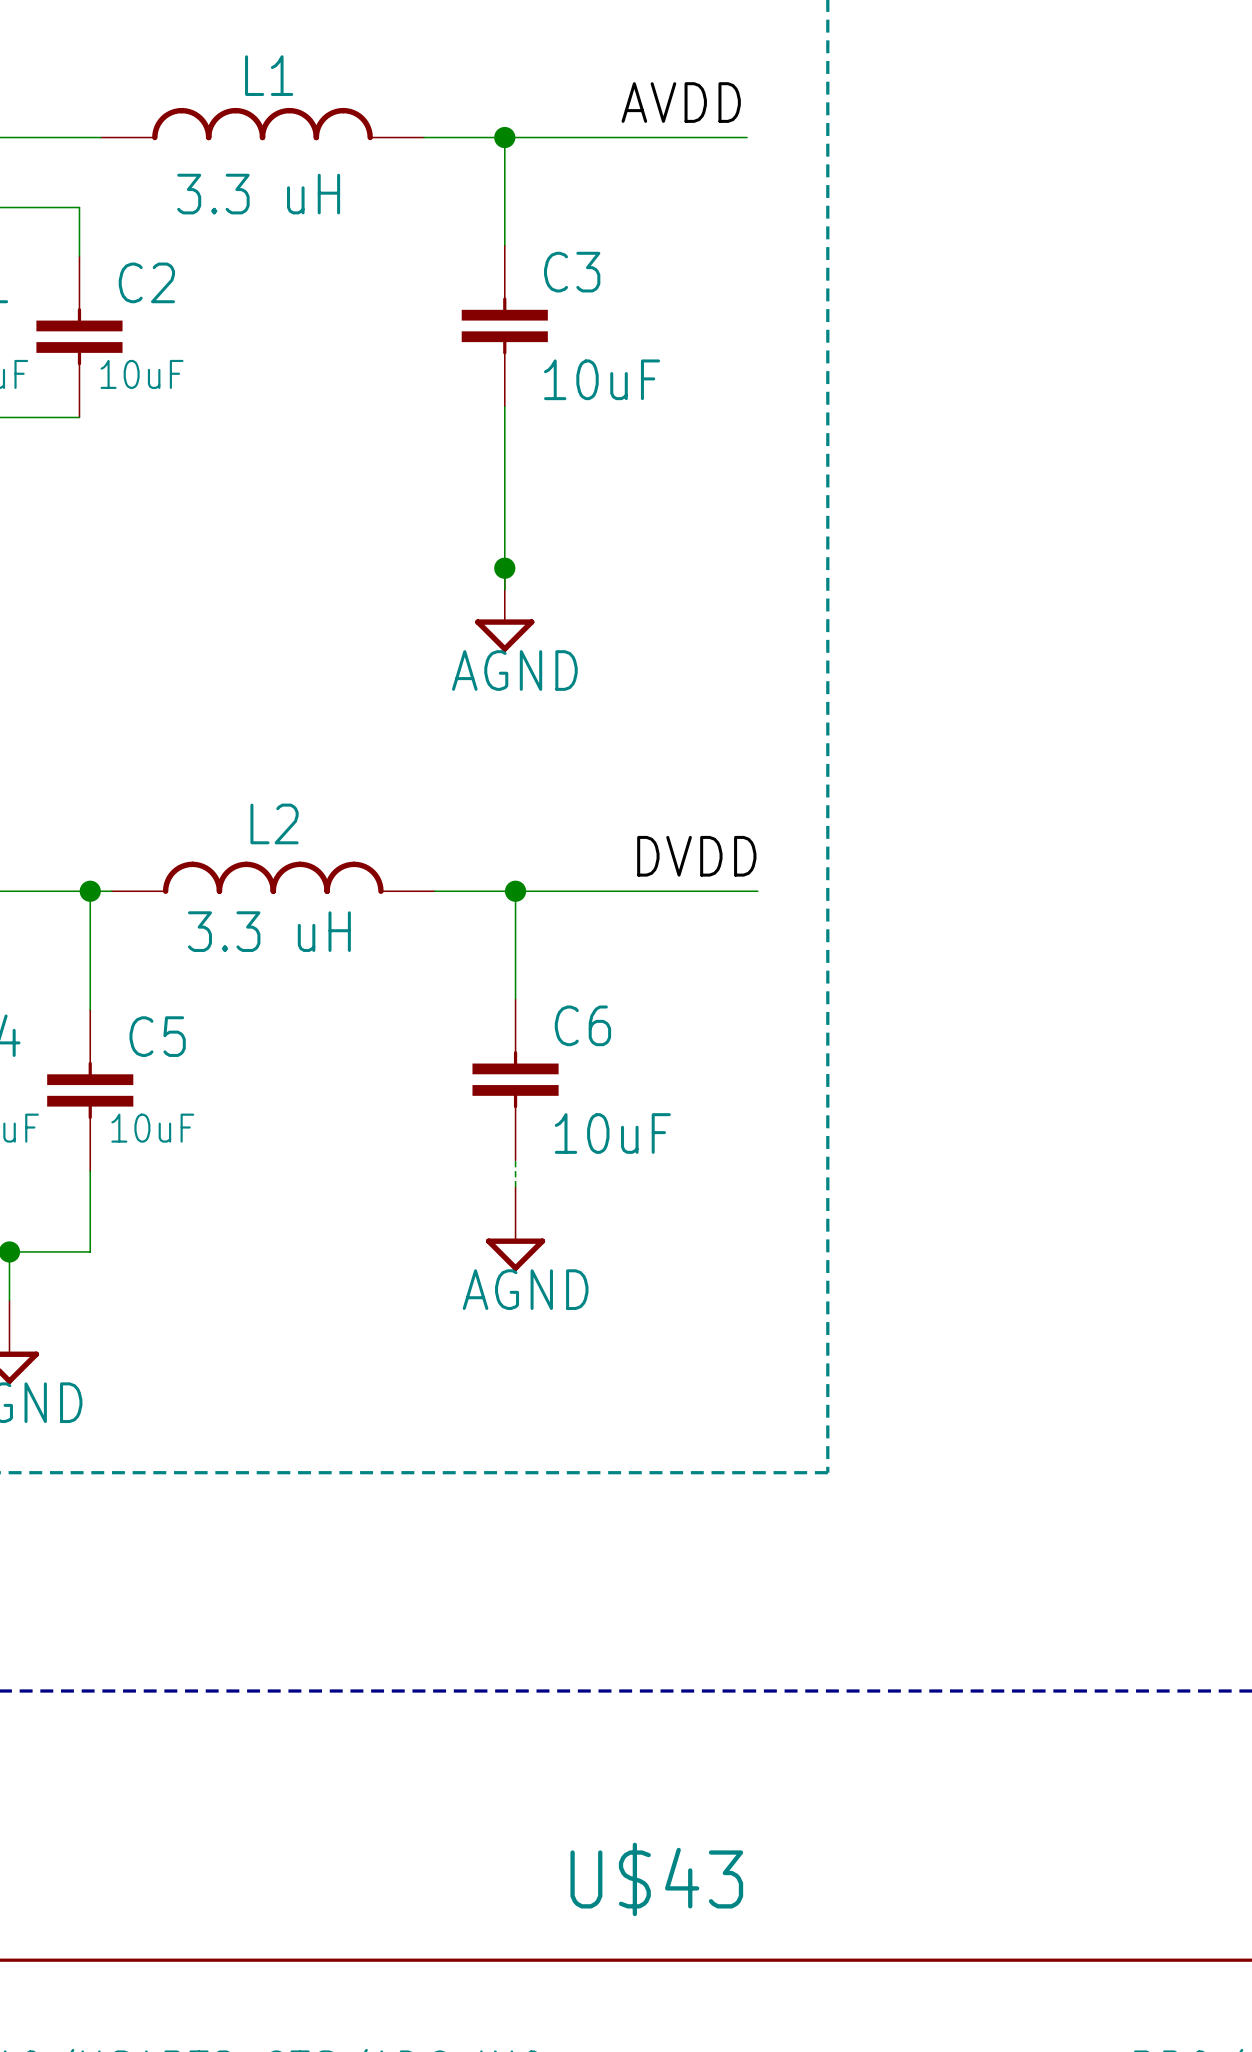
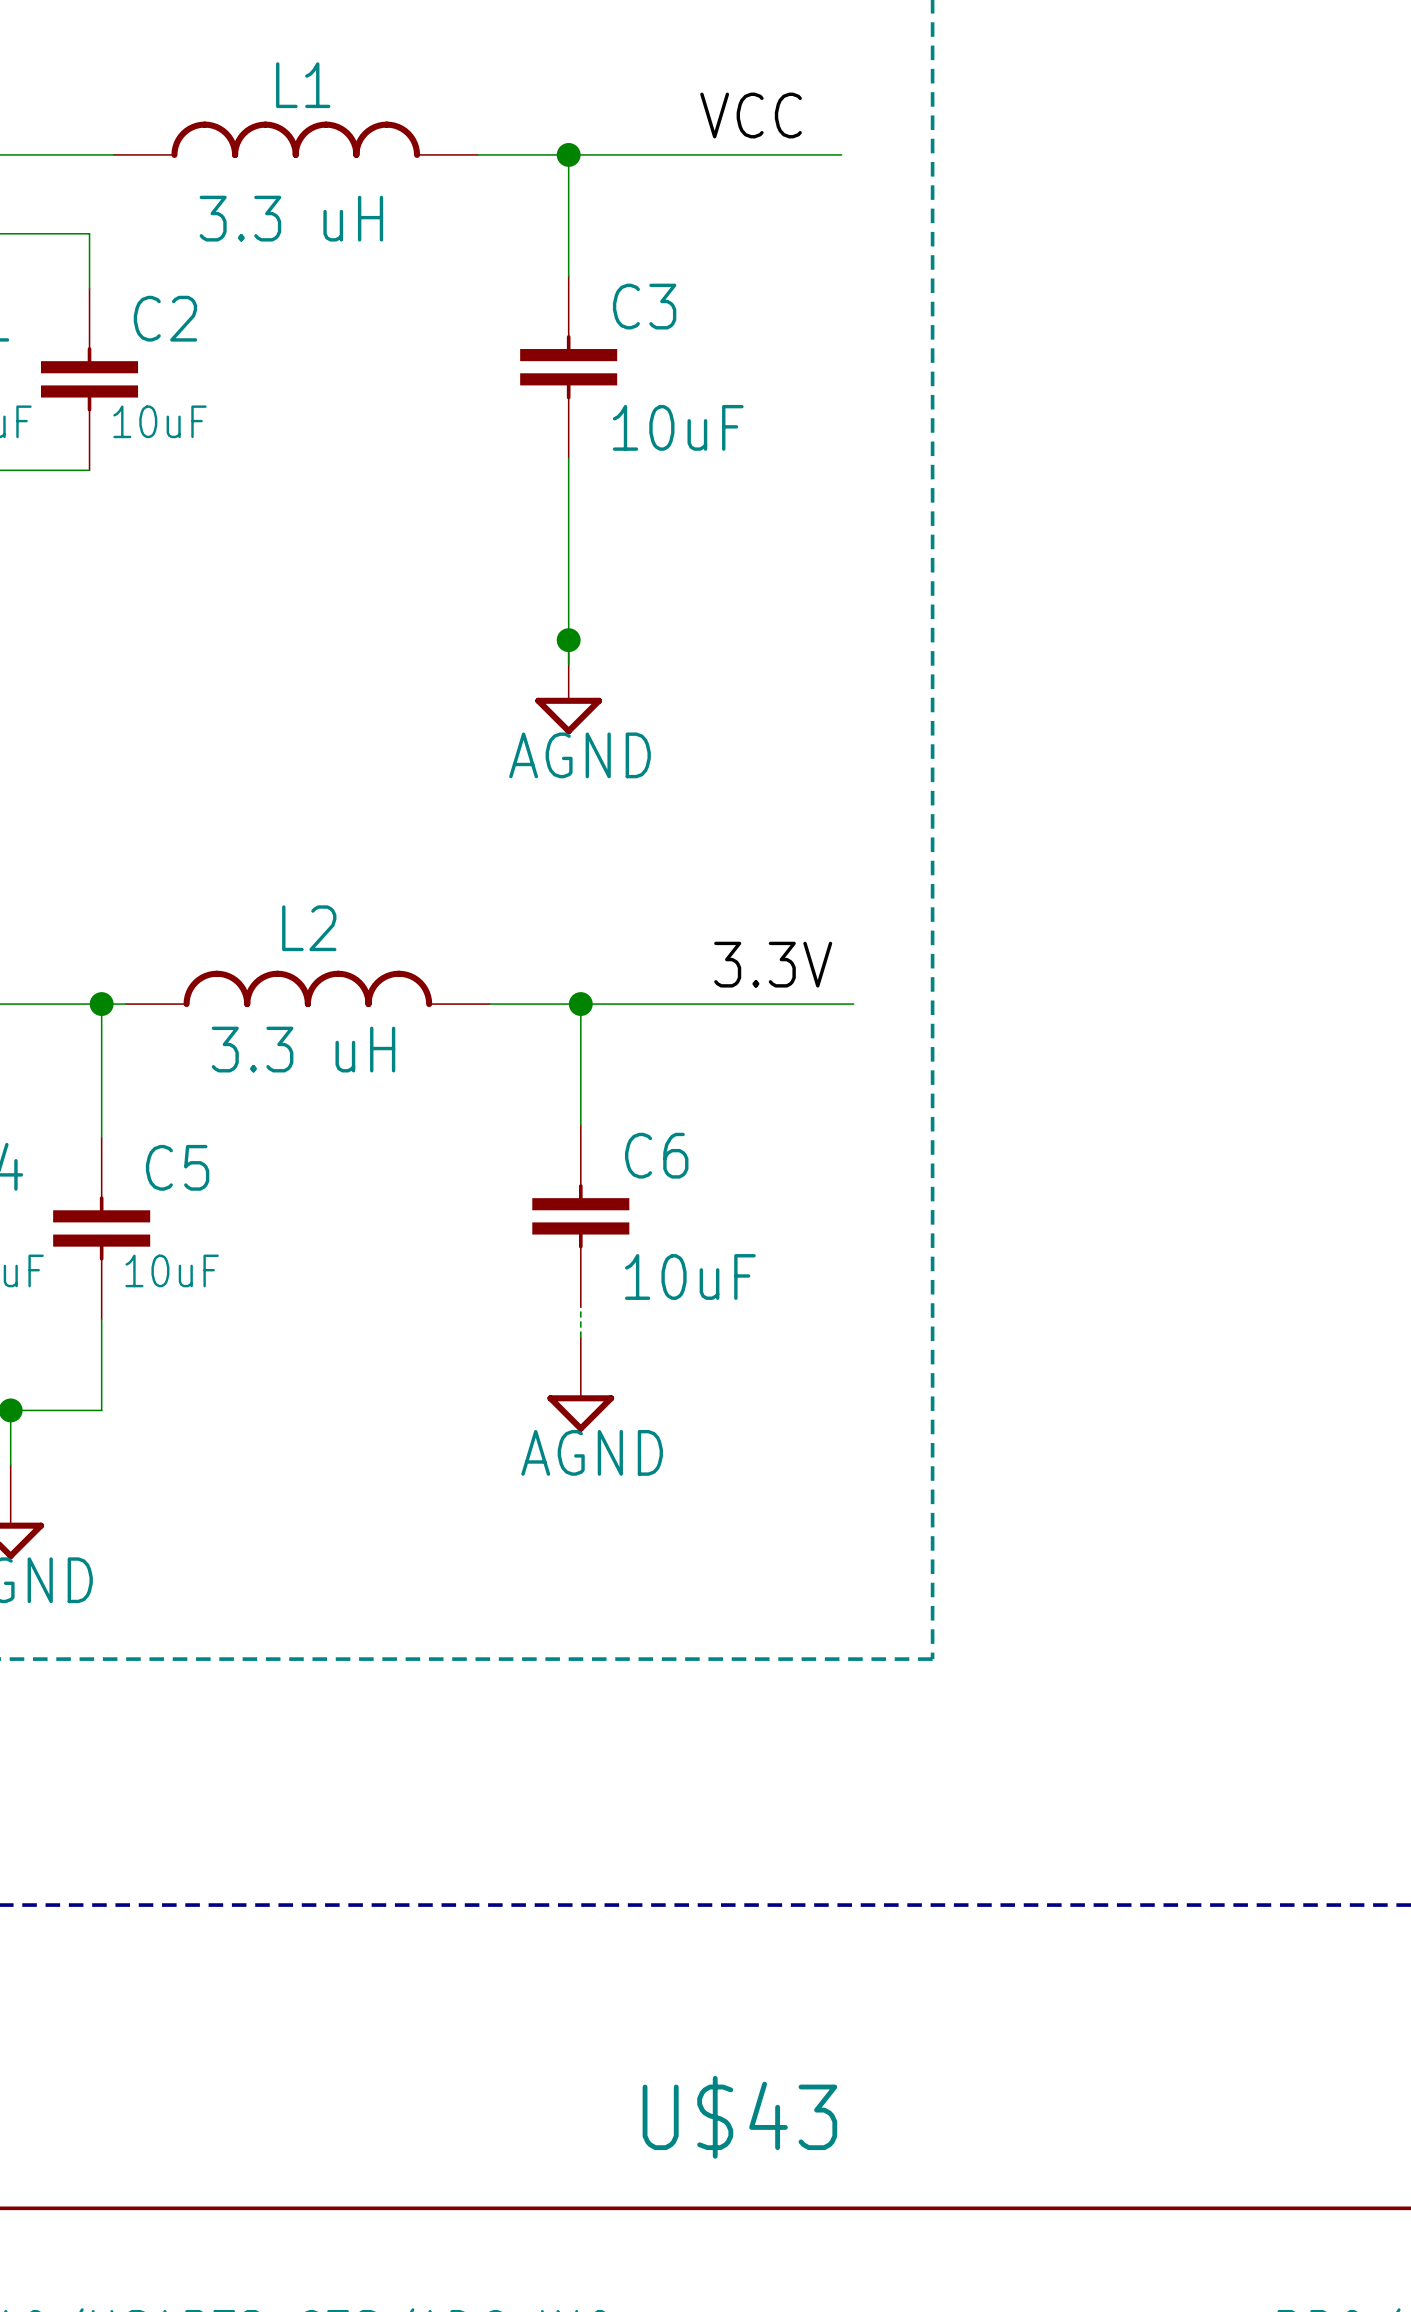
label: AVDD (681, 102) -> VCC (751, 115)
label: DVDD (696, 856) -> 3.3V (773, 964)

